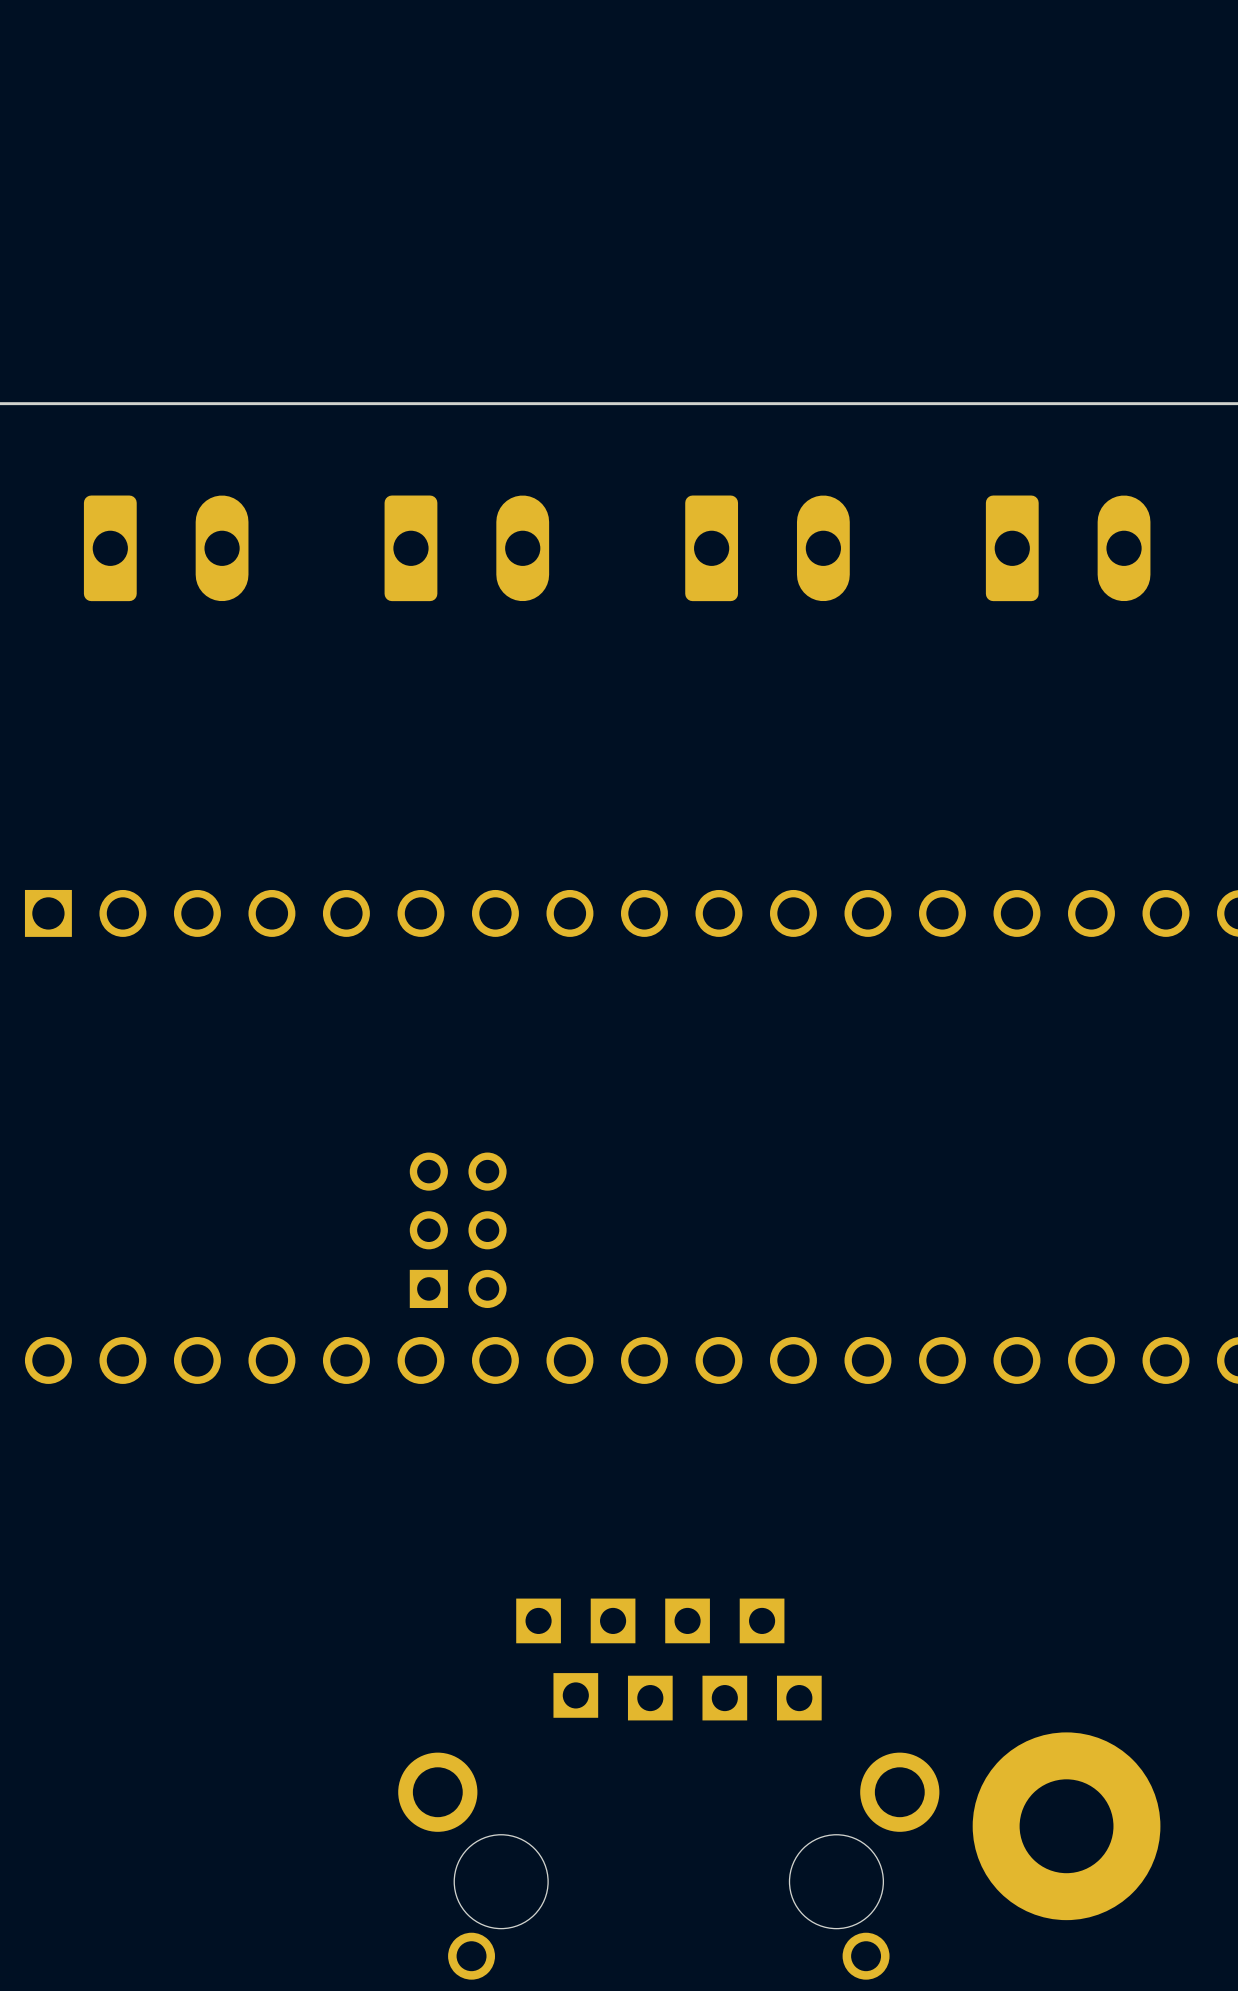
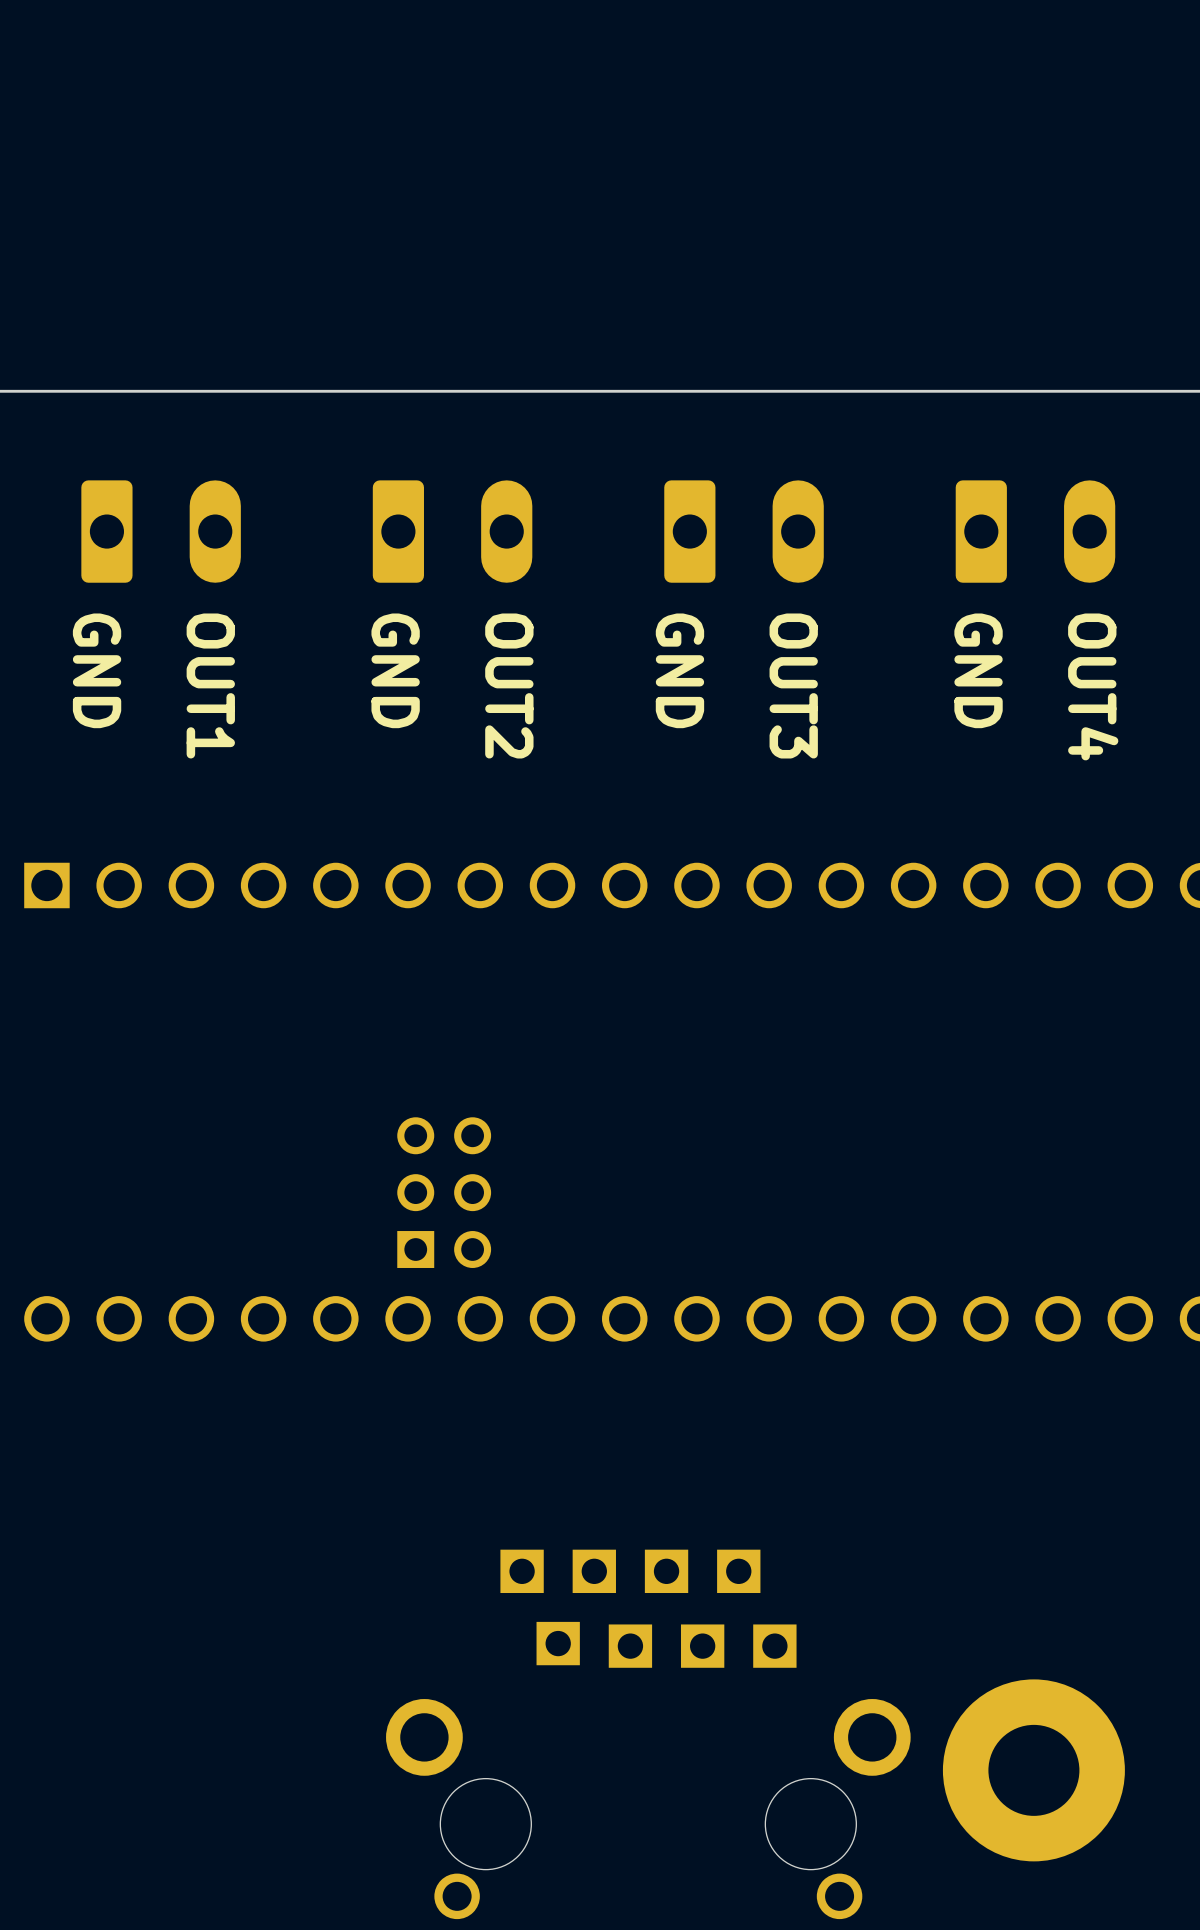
text: none -> GND (97, 670)
text: none -> GND (395, 670)
text: none -> GND (679, 670)
text: none -> GND (978, 670)
text: none -> OUT1 (210, 685)
text: none -> OUT2 (509, 685)
text: none -> OUT3 (793, 685)
text: none -> OUT4 (1093, 686)

